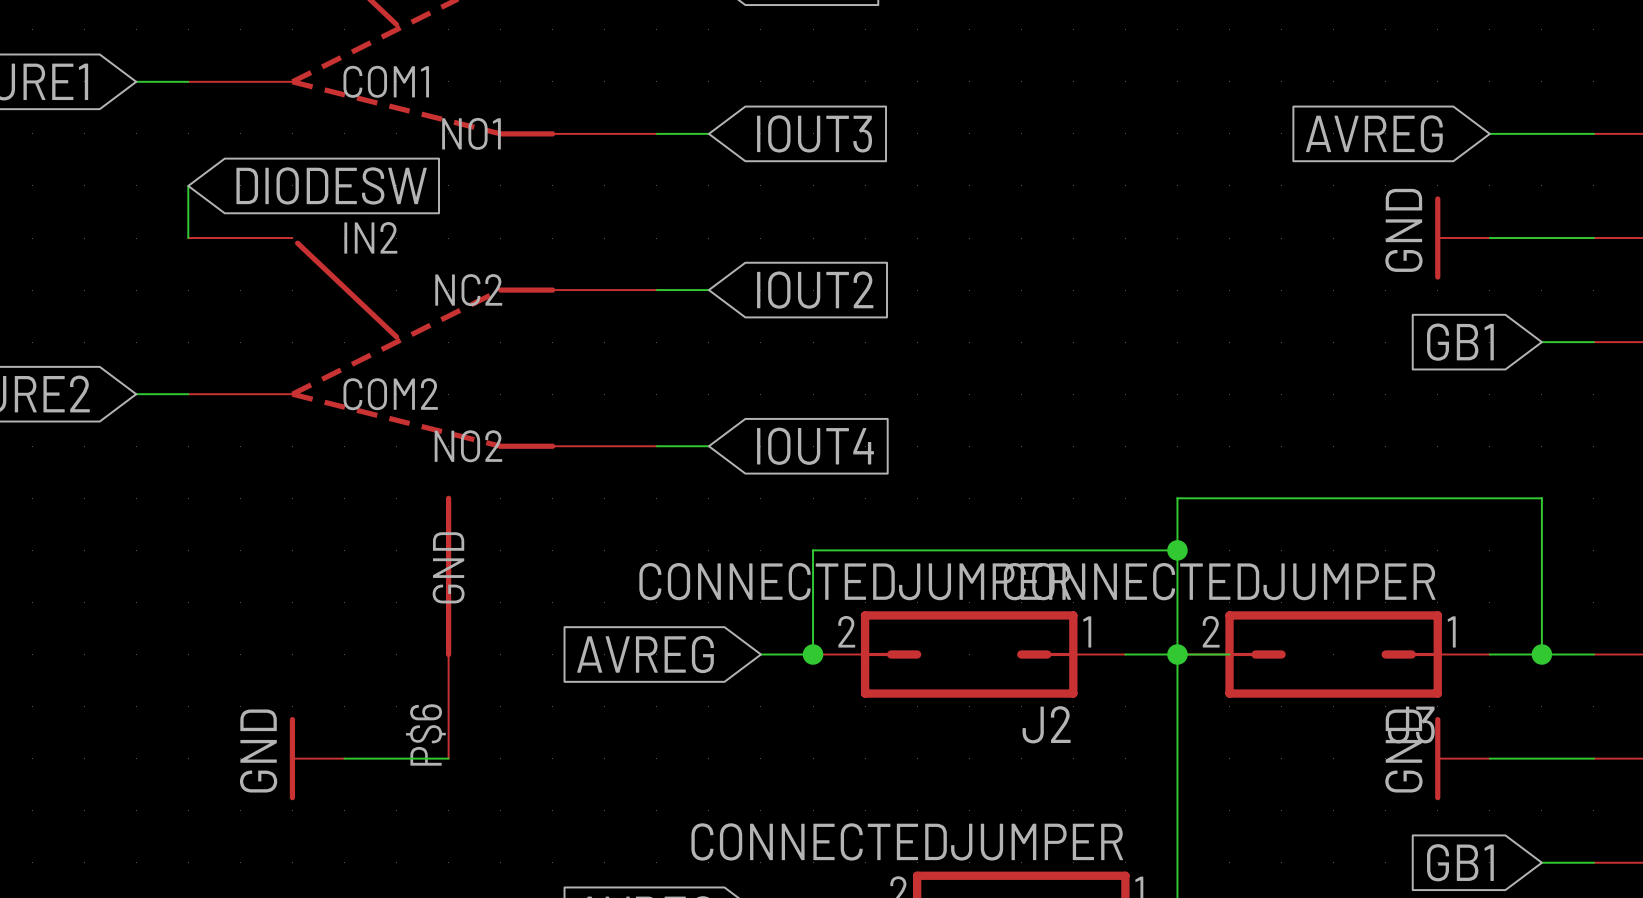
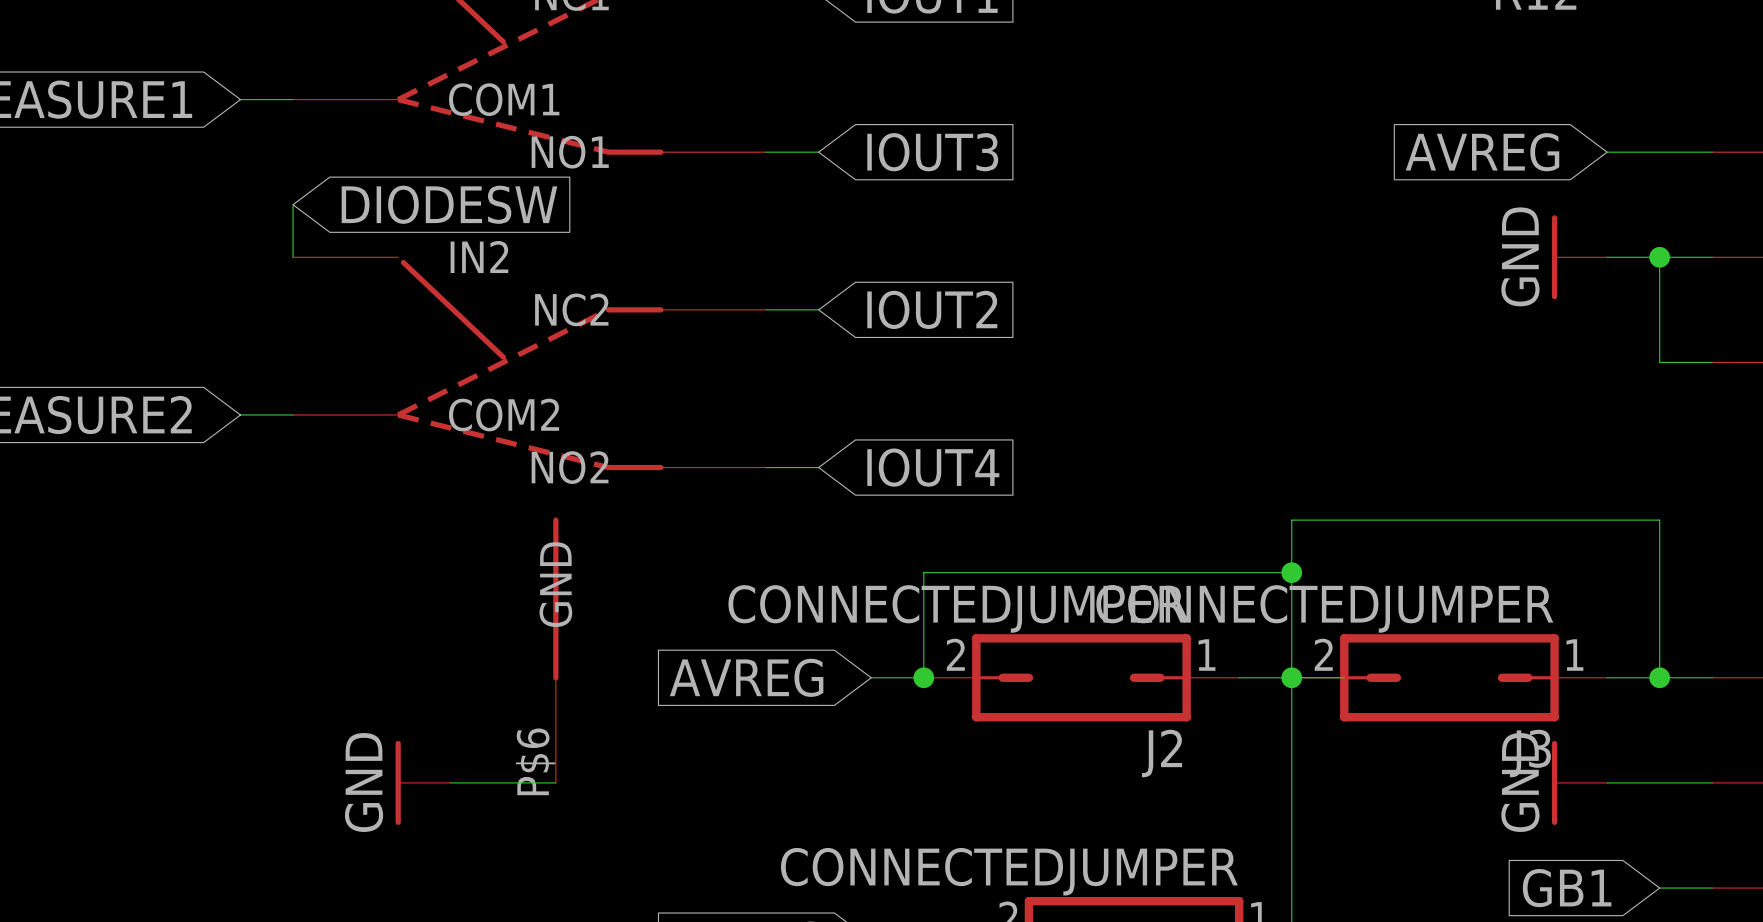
wire: none -> (1659, 257) (1659, 362)
junction: none -> (1659, 257)
global label: GB1 (1460, 342) -> none

